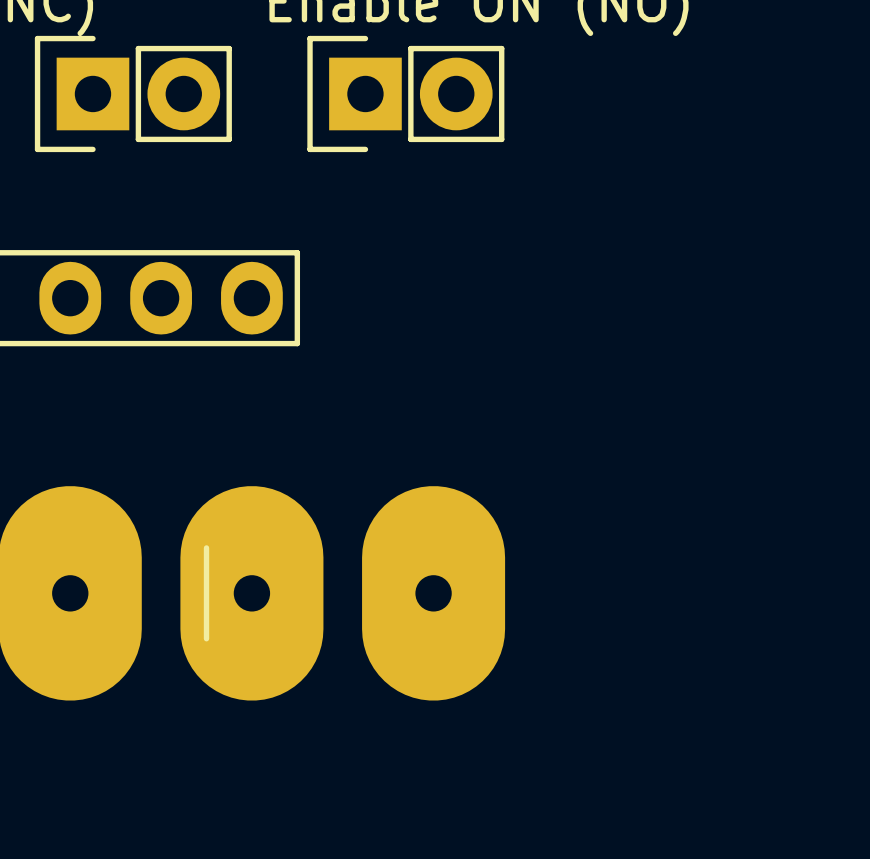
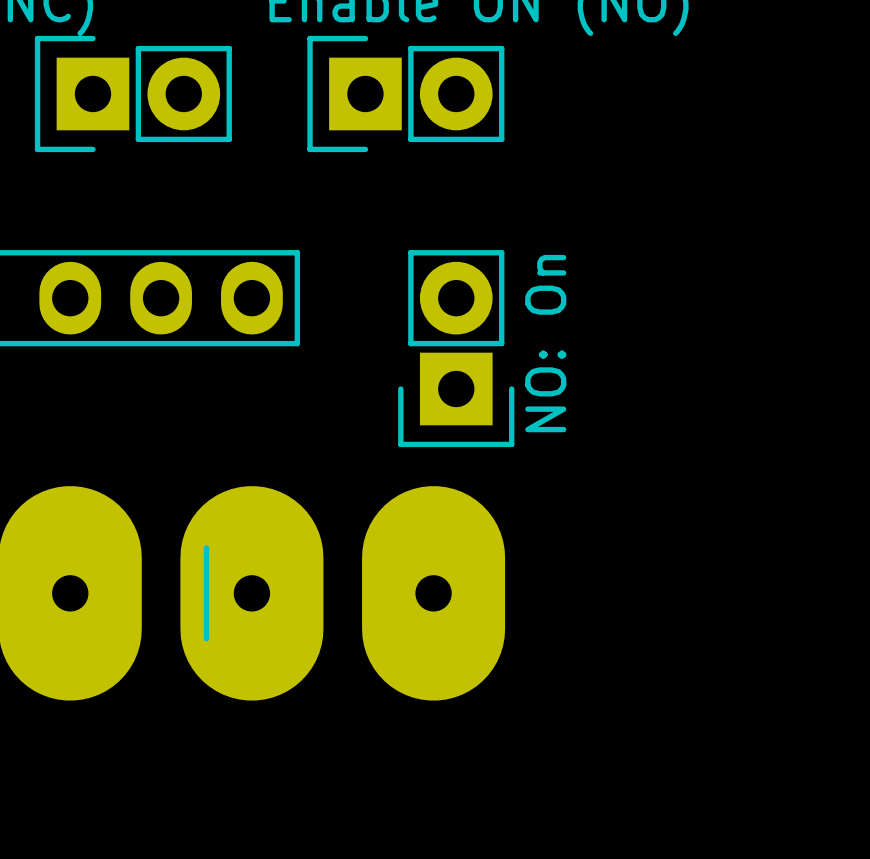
part: none -> NO: On (456, 348)

